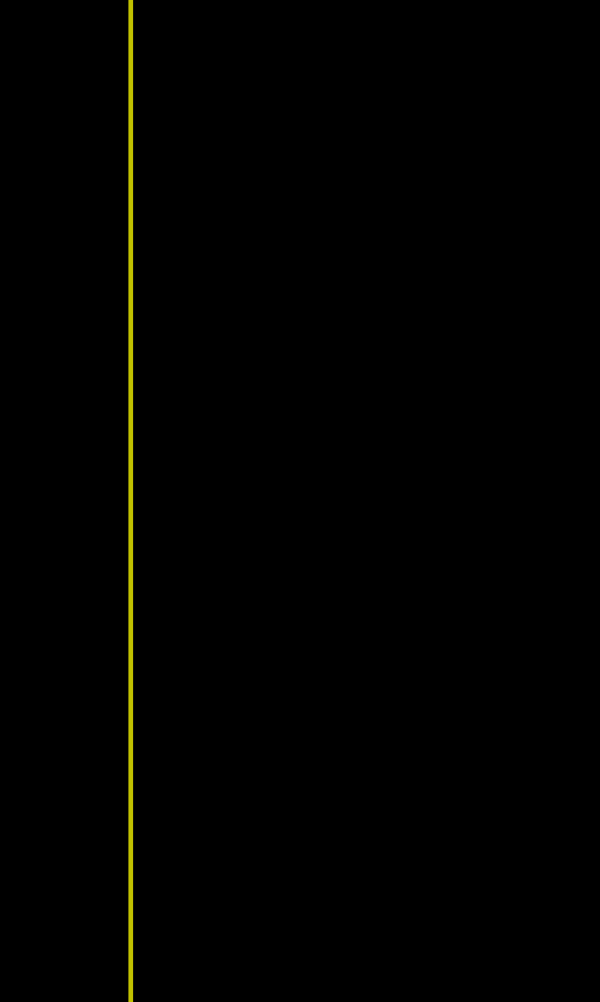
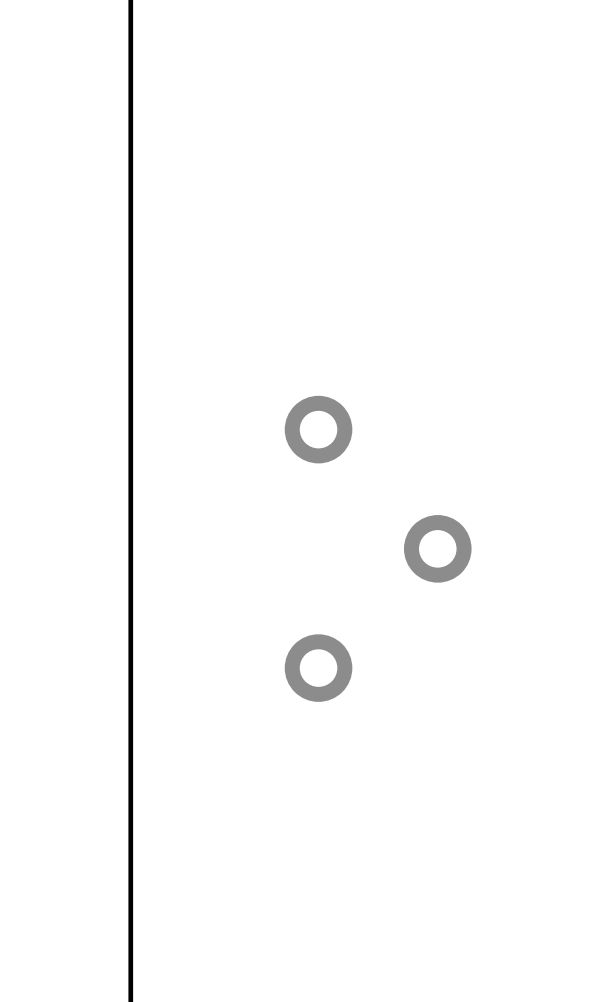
part: none -> (378, 548)

